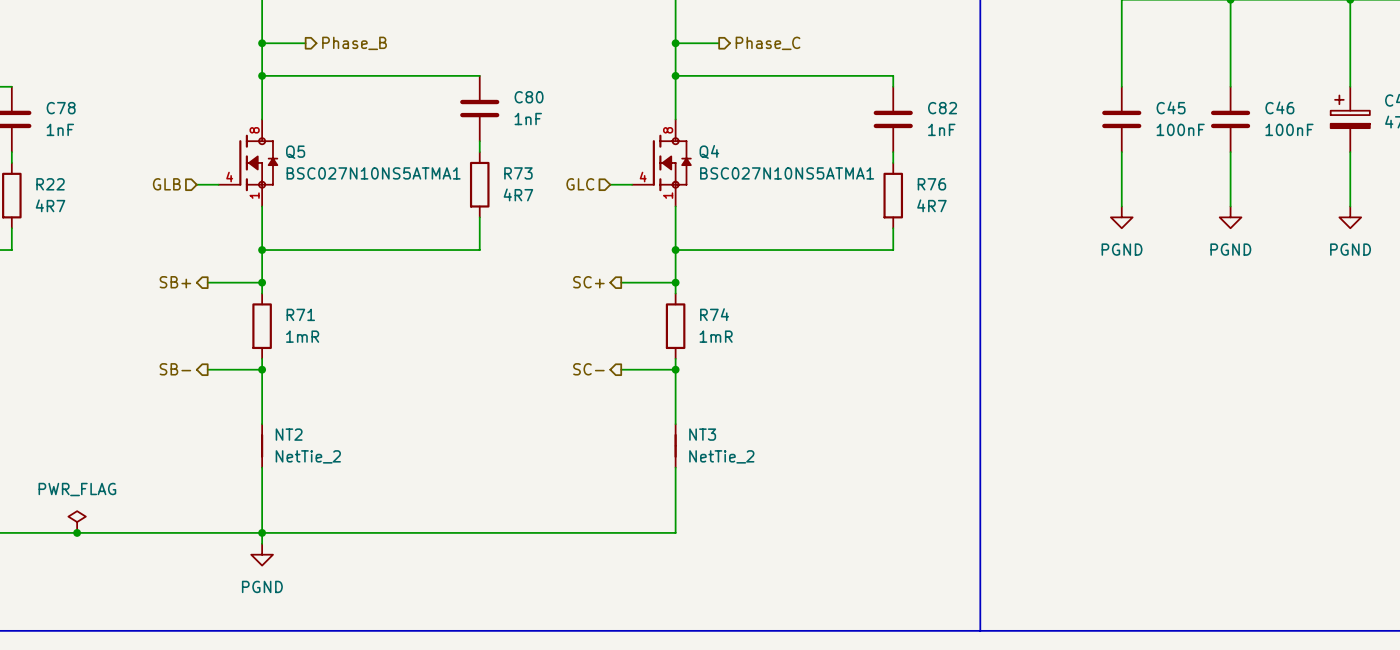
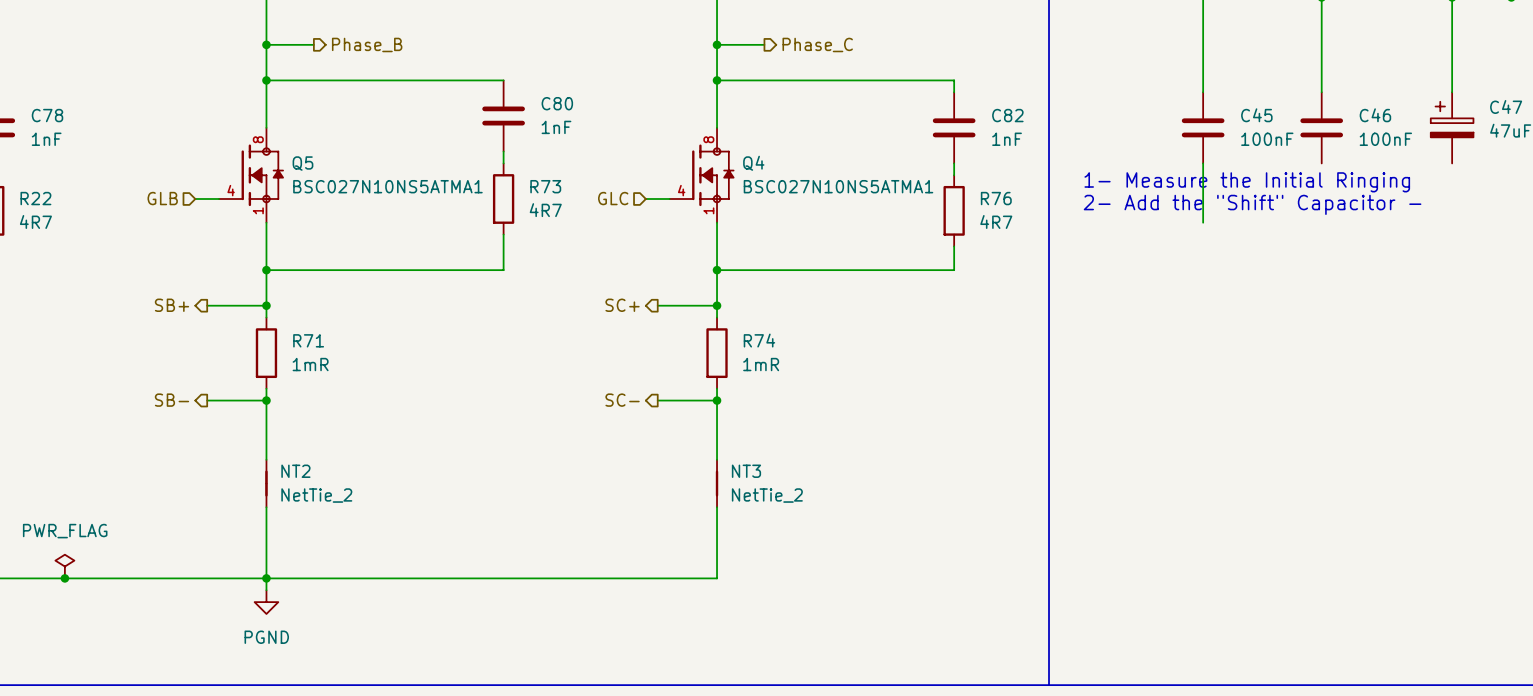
wire: (1230, 152) (1230, 206) -> none
wire: (1350, 152) (1350, 206) -> none
text: none -> 1- Measure the Initial Ringing (1247, 182)
text: none -> 2- Add the "Shift" Capacitor - (1252, 204)
power symbol: PGND (1121, 217) -> none
power symbol: PGND (1230, 217) -> none
power symbol: PGND (1350, 217) -> none

